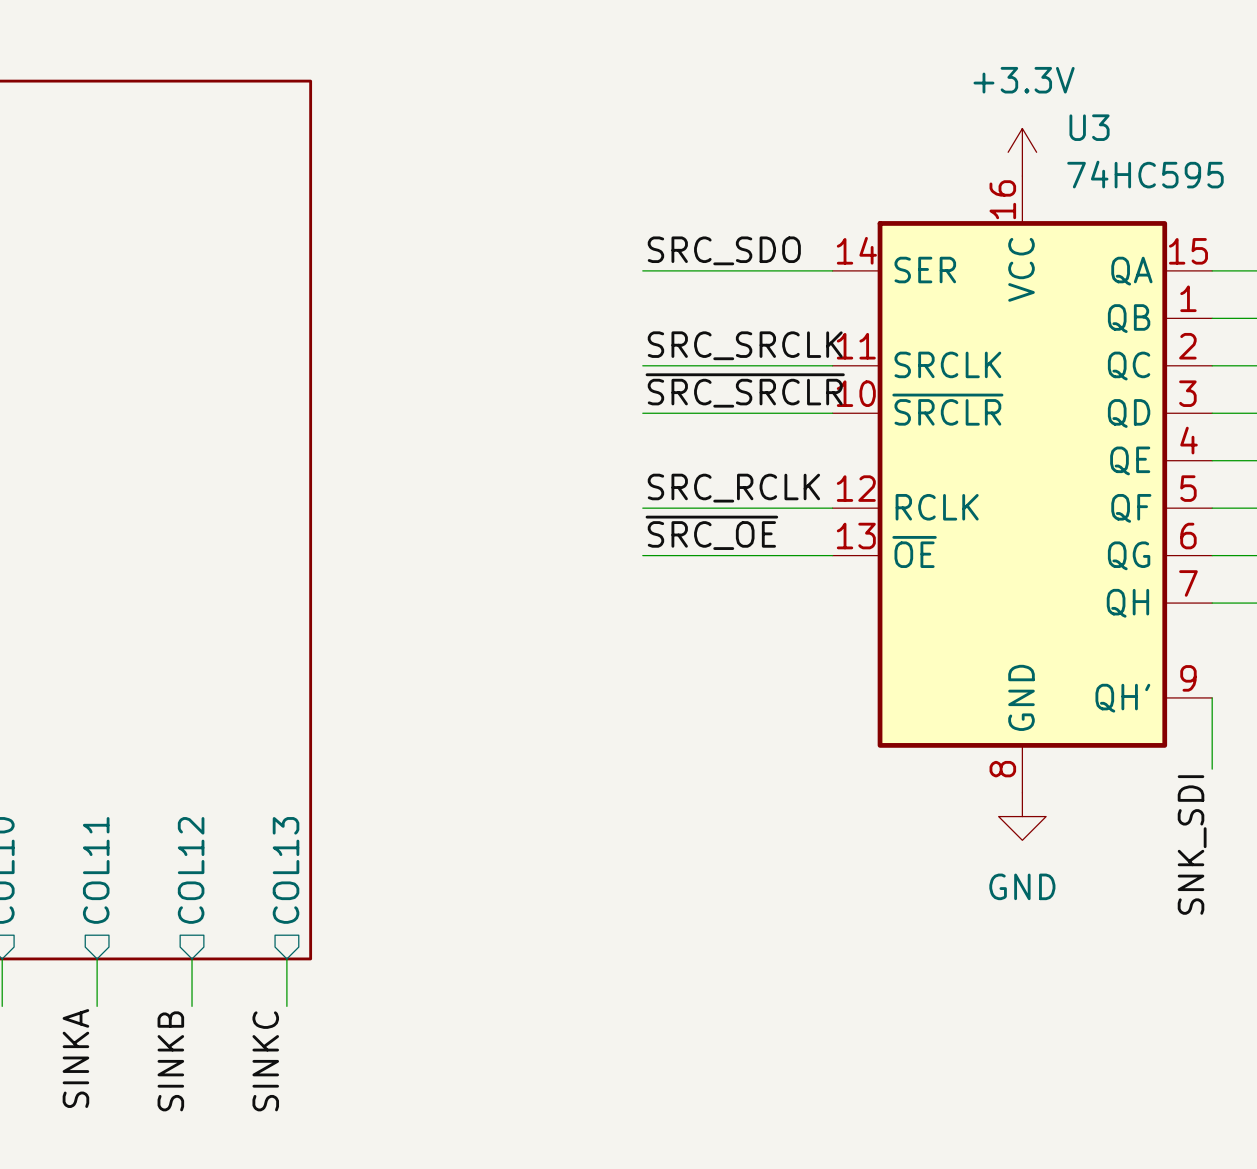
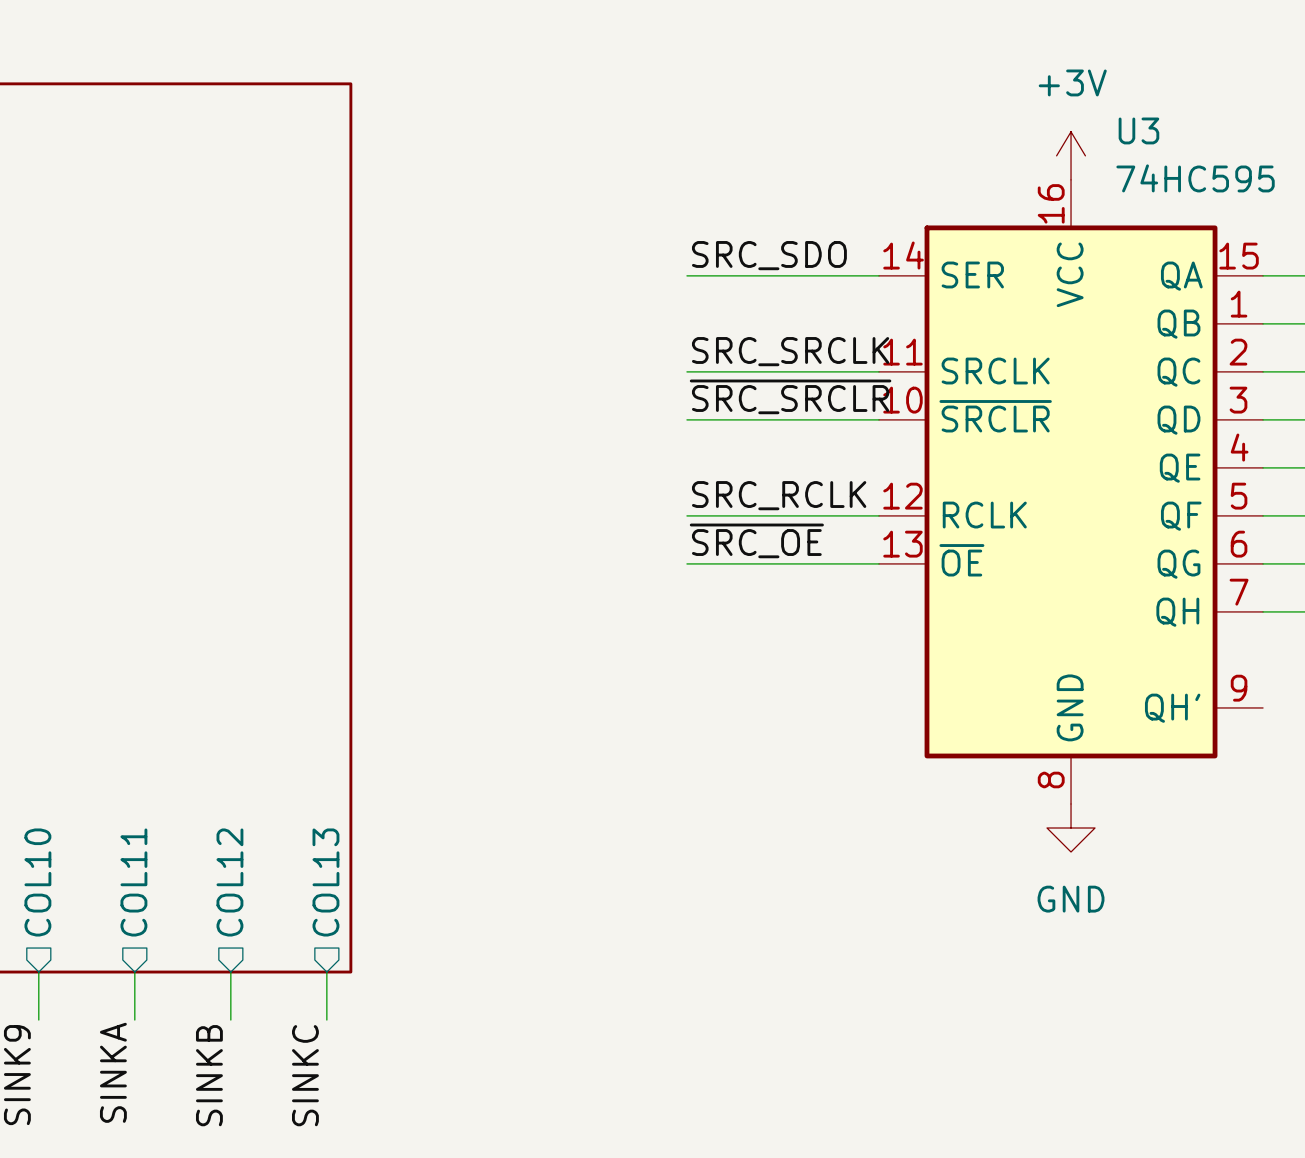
power symbol: +3.3V (1022, 152) -> +3V (1071, 155)
wire: (1212, 697) (1212, 769) -> none
label: SNK_SDI (1192, 845) -> none

